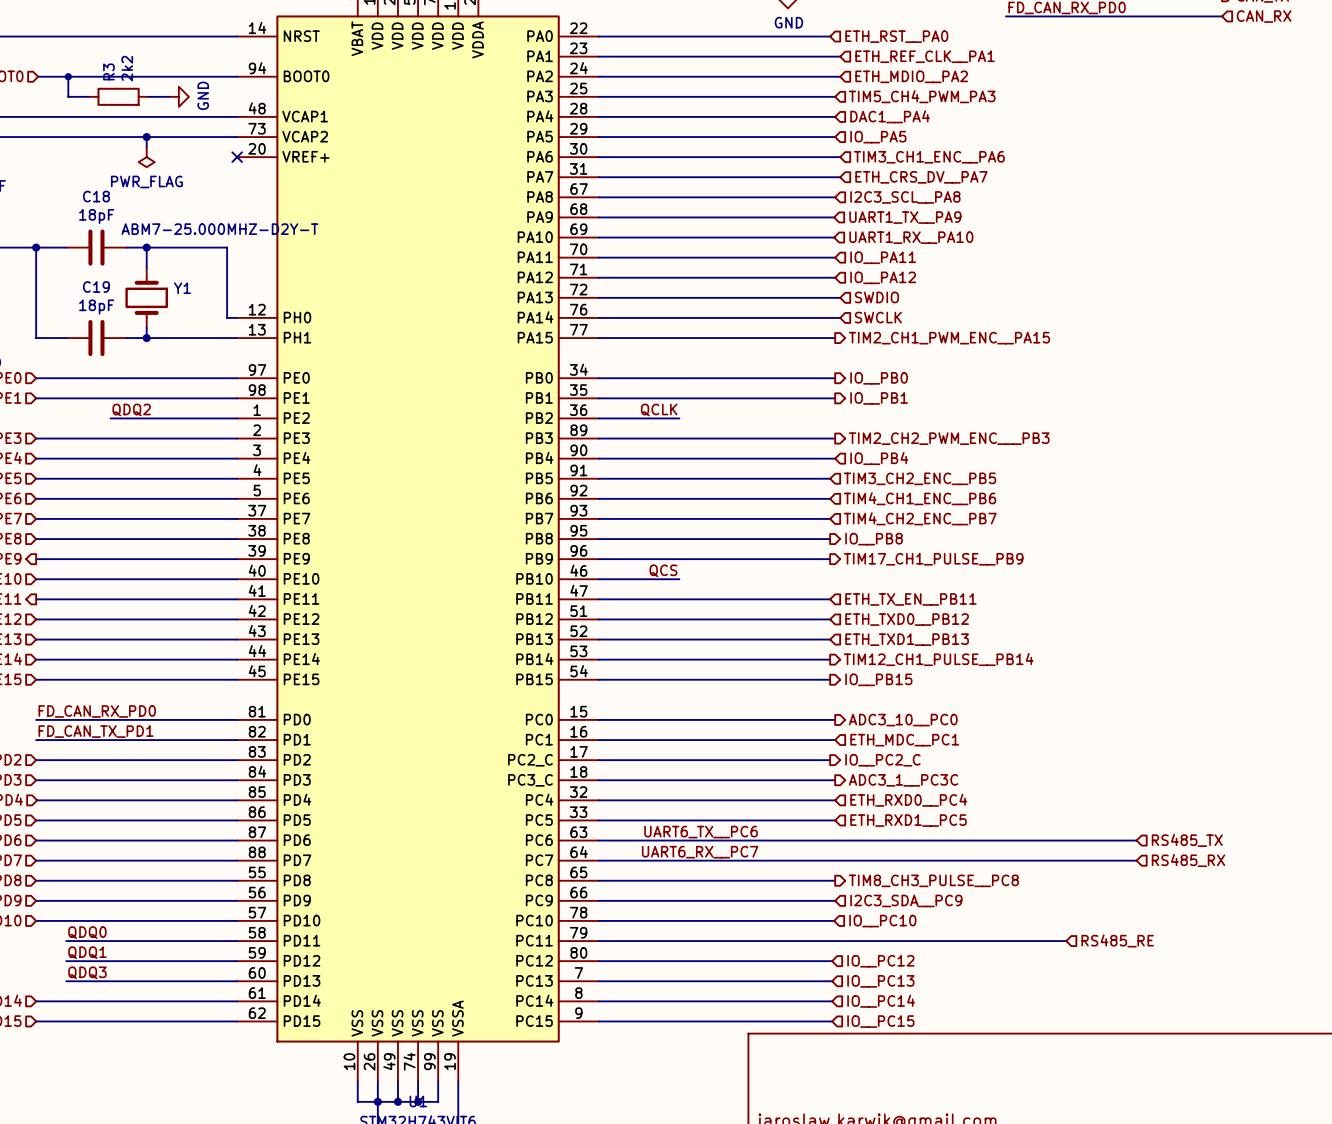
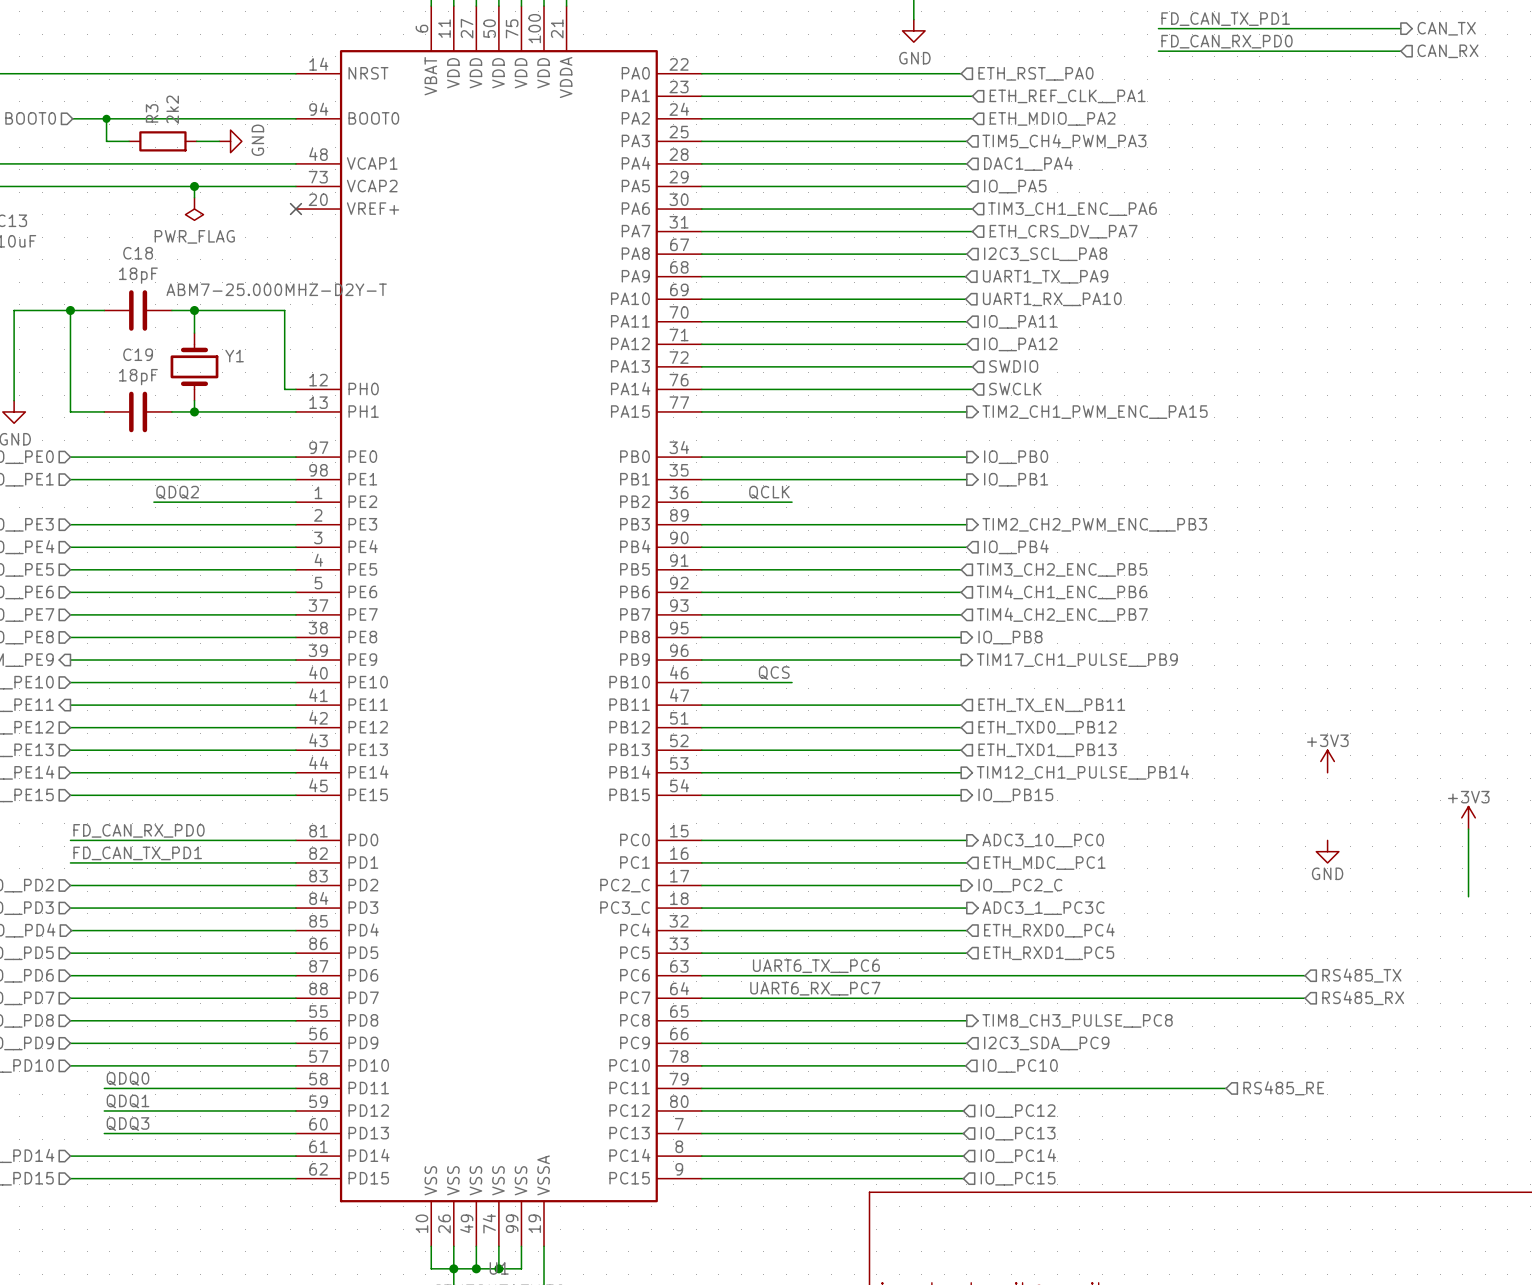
power symbol: none -> +3V3 (1327, 761)
power symbol: none -> +3V3 (1468, 817)
wire: none -> (1468, 829) (1468, 896)
power symbol: none -> GND (1327, 851)

